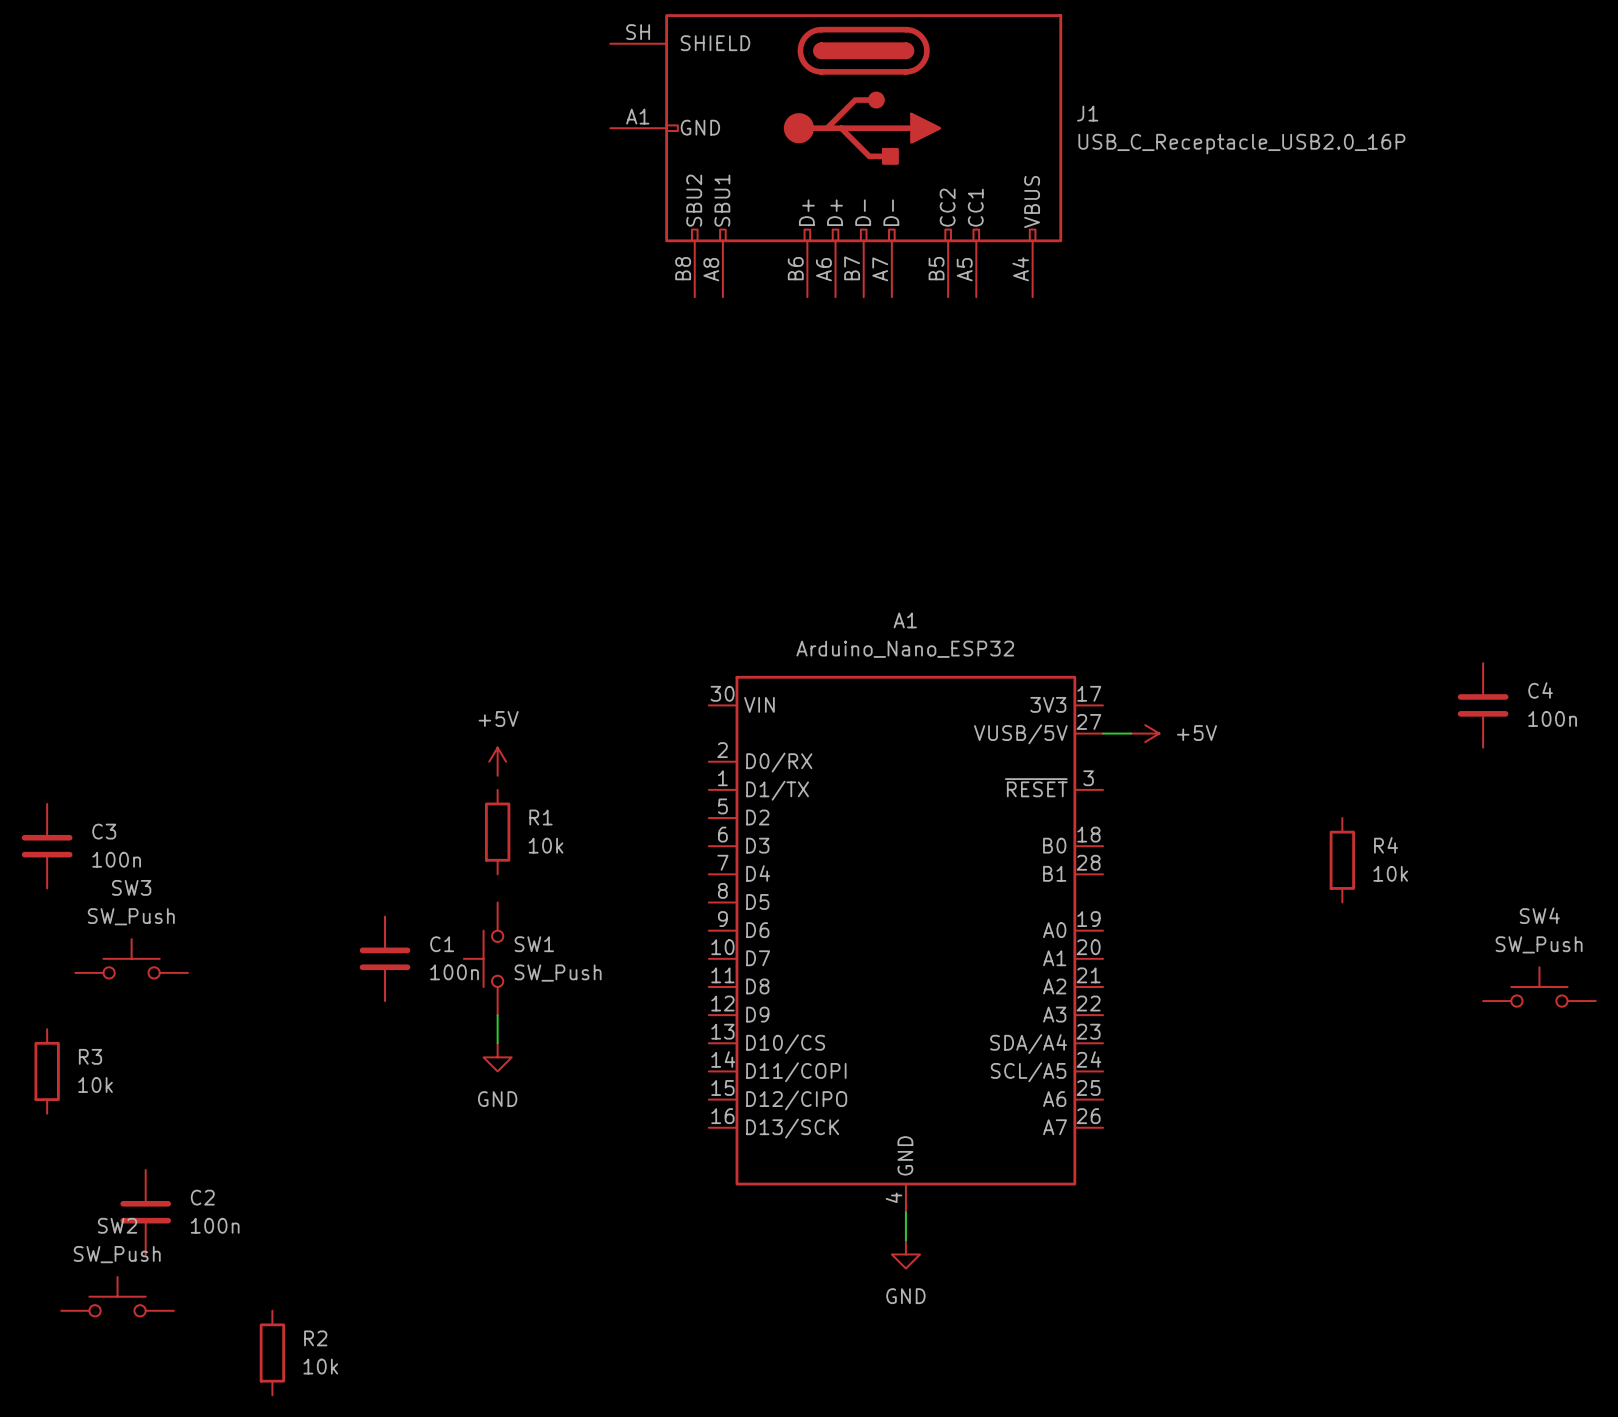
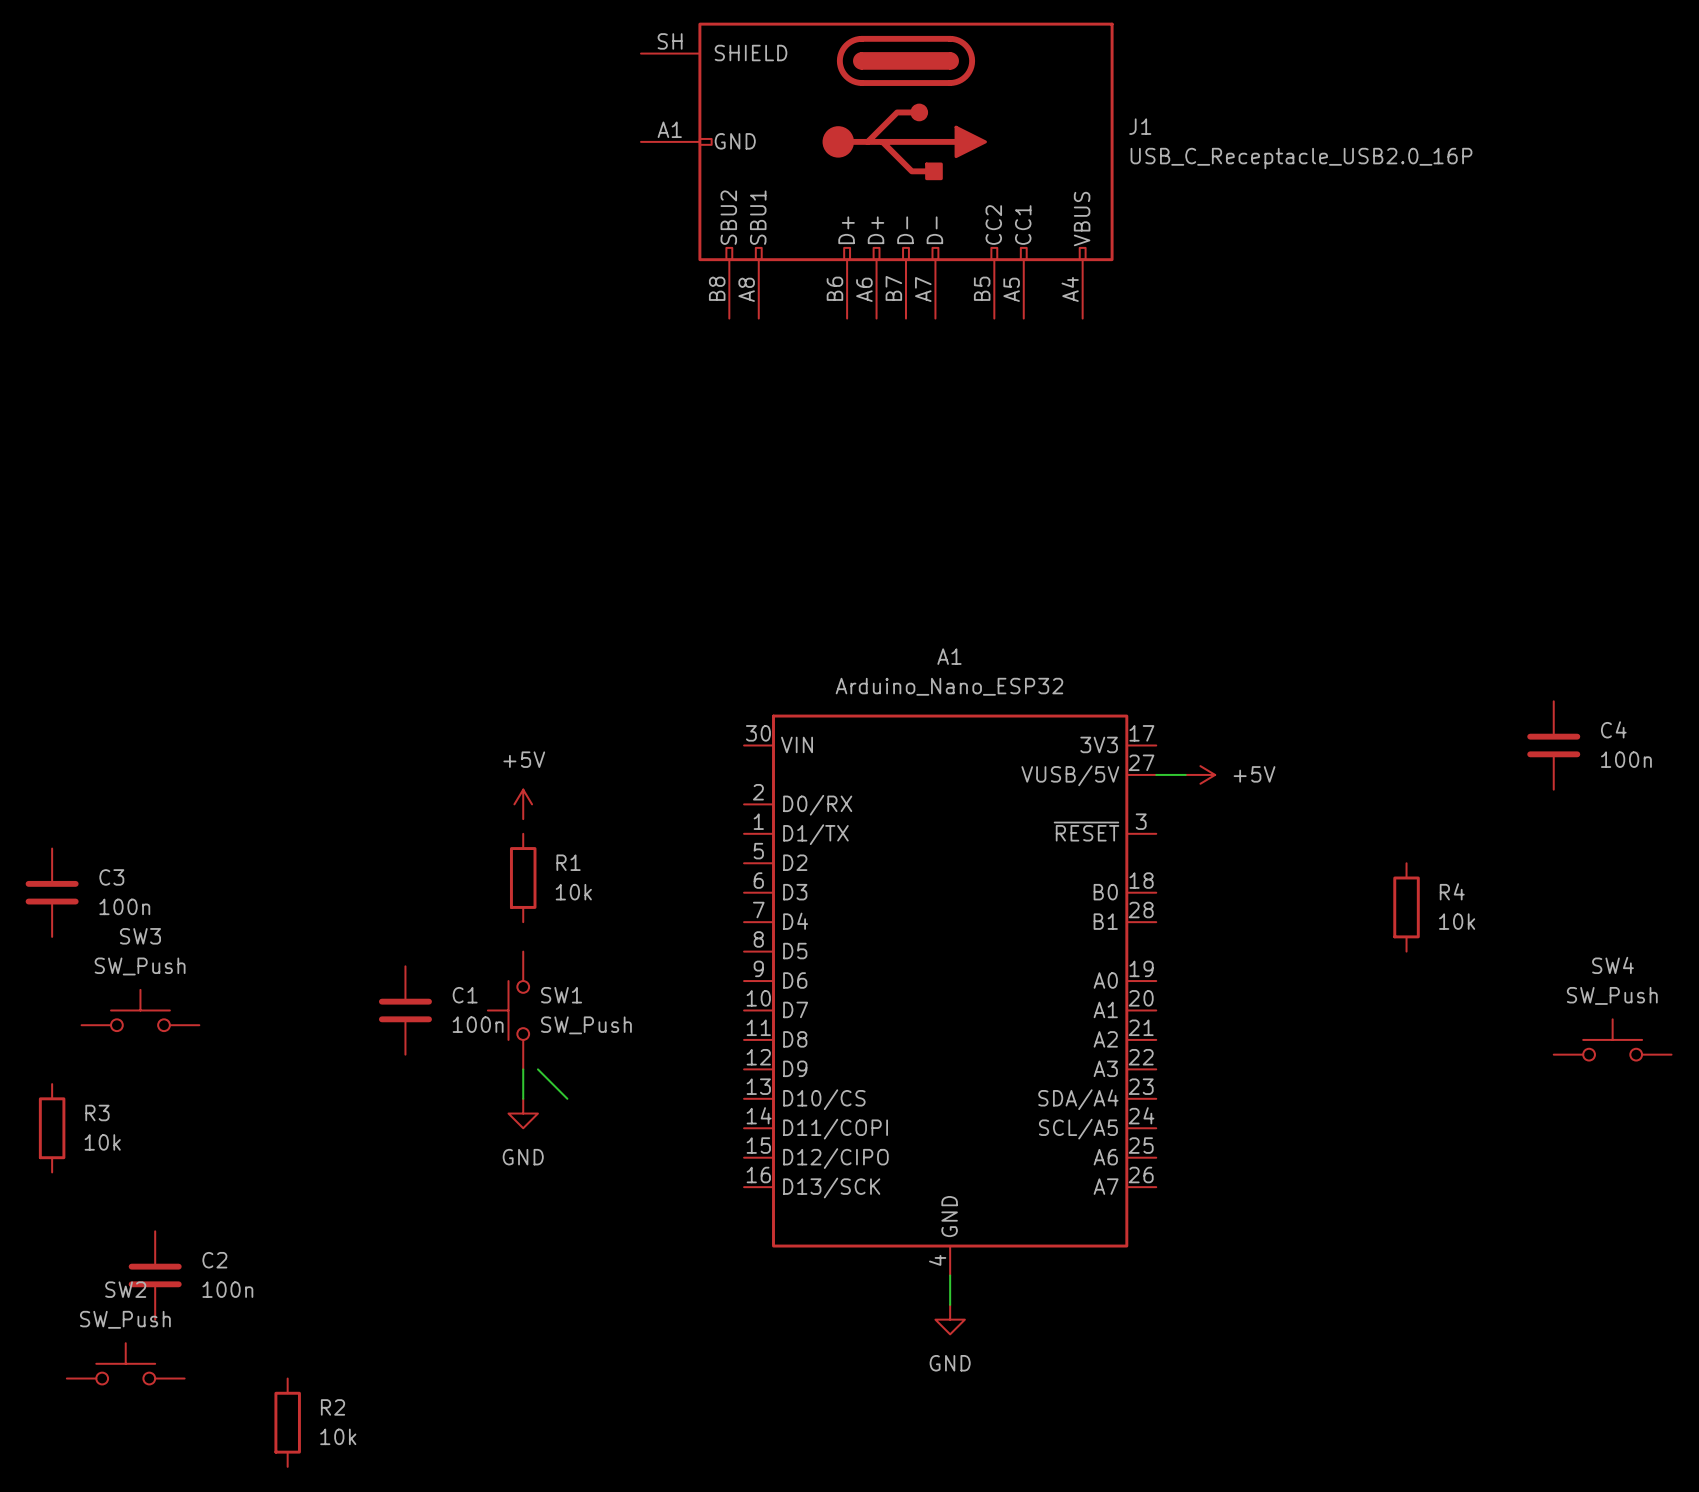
wire: none -> (537, 1069) (567, 1098)

